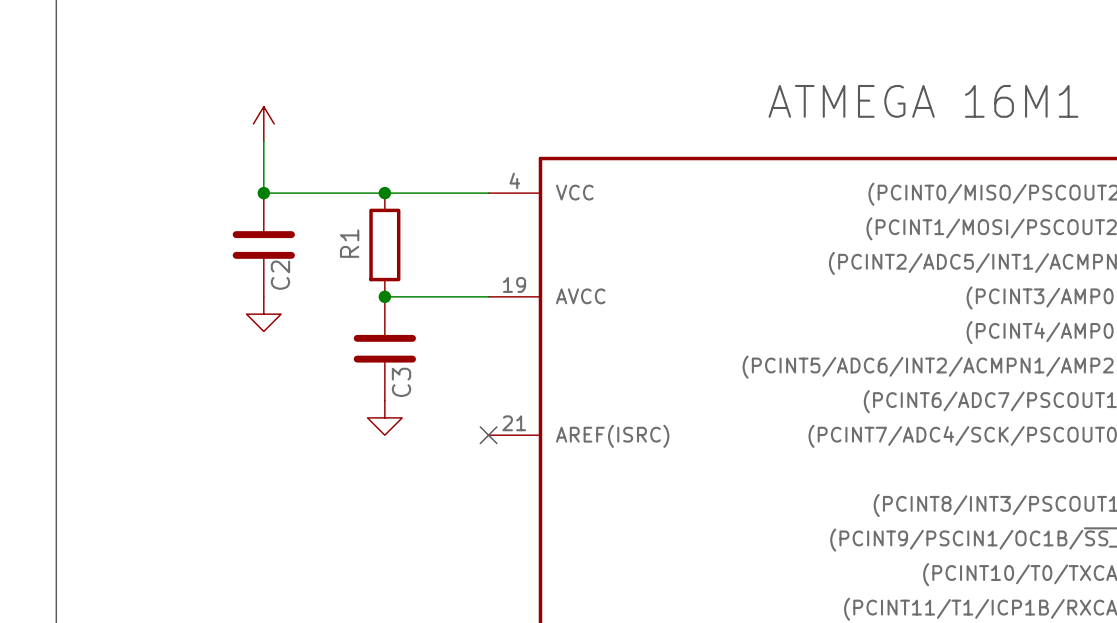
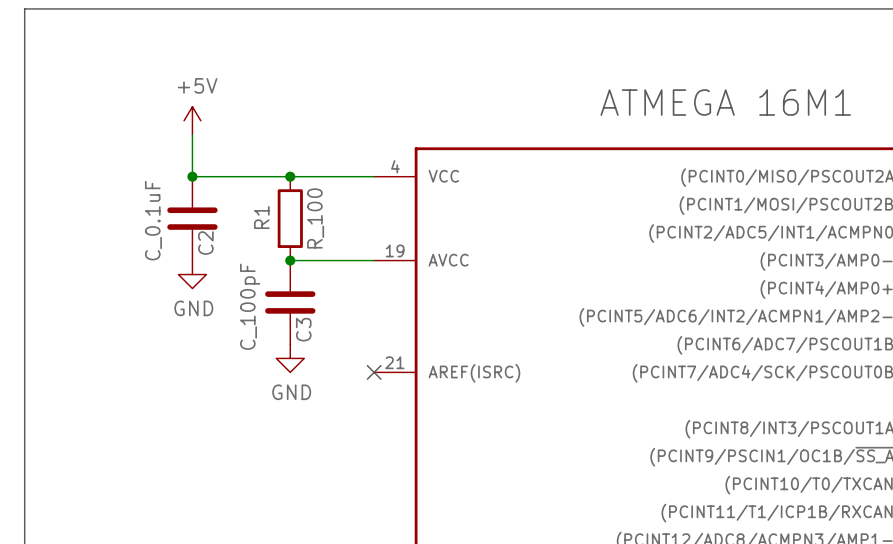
power symbol text: none -> +5V (197, 85)
R1 value: none -> R_100 (315, 218)
C2 value: none -> C_0.1uF (153, 220)
C3 value: none -> C_100pF (250, 306)
power symbol text: none -> GND (193, 308)
power symbol text: none -> GND (291, 392)

